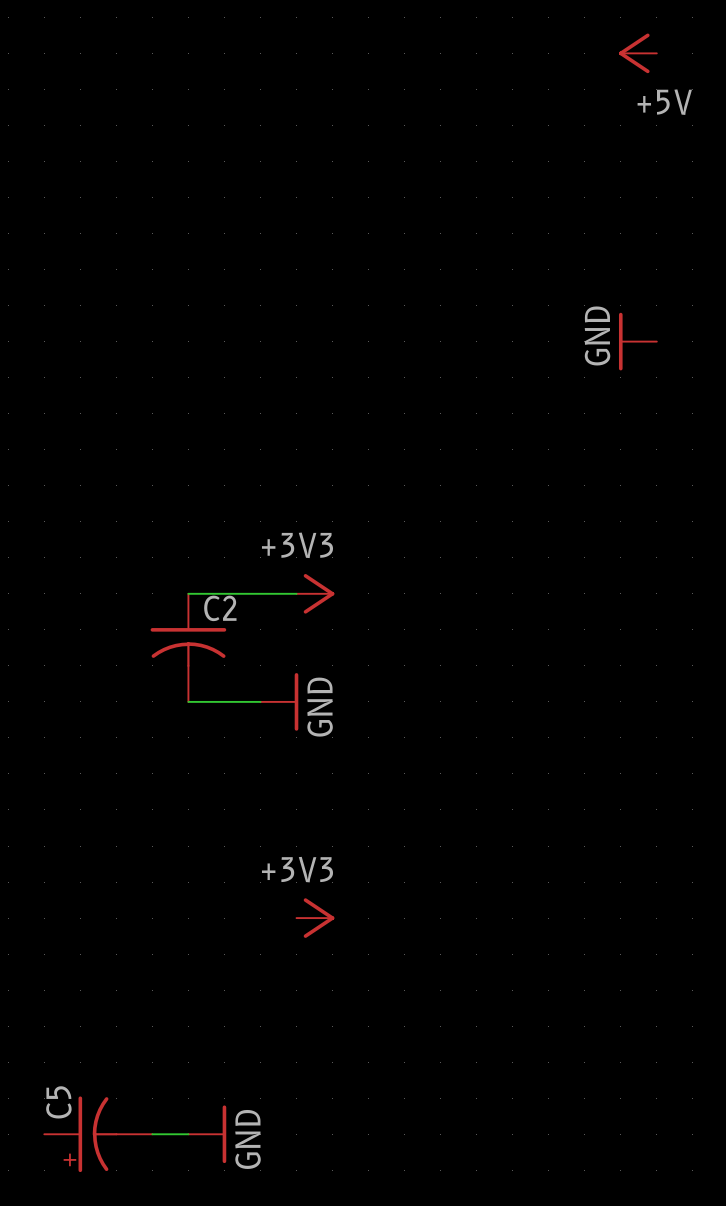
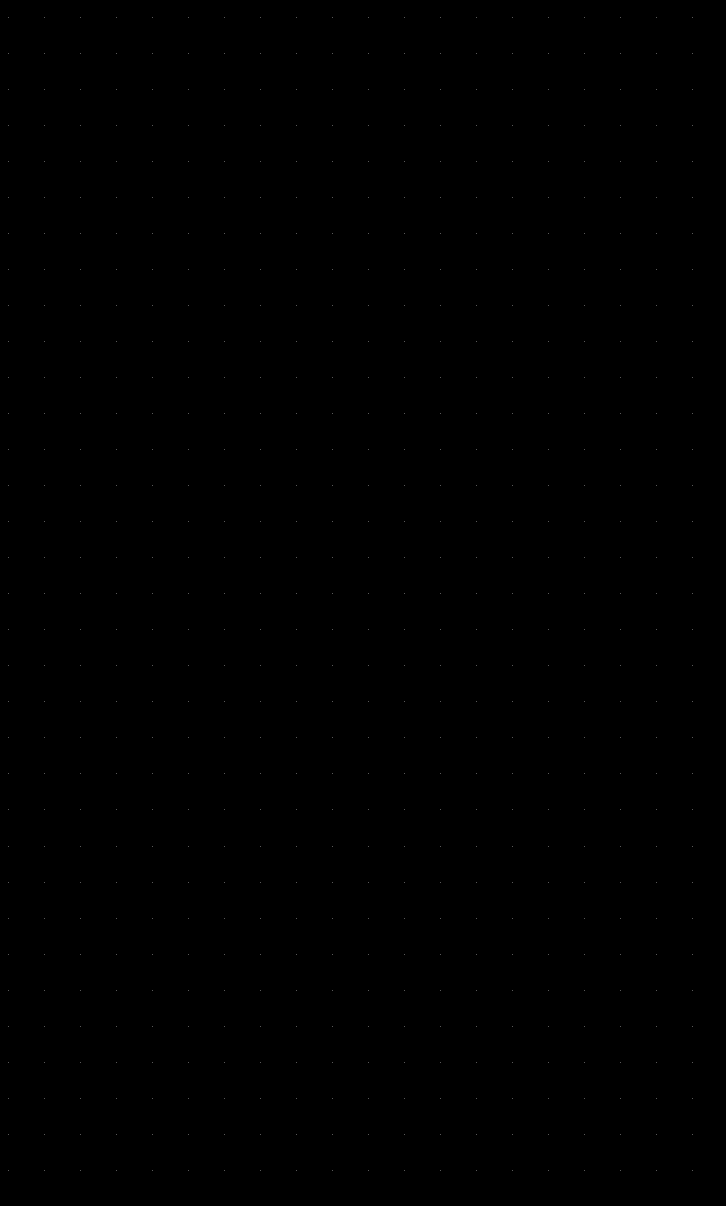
power symbol: +5V (637, 53) -> none
power symbol: GND (637, 341) -> none
wire: (188, 593) (296, 593) -> none
power symbol: +3V3 (315, 593) -> none
C2: (188, 647) -> none
wire: (188, 701) (260, 701) -> none
power symbol: GND (279, 701) -> none
power symbol: +3V3 (315, 918) -> none
C5: (98, 1134) -> none
wire: (152, 1134) (188, 1134) -> none
power symbol: GND (207, 1134) -> none

